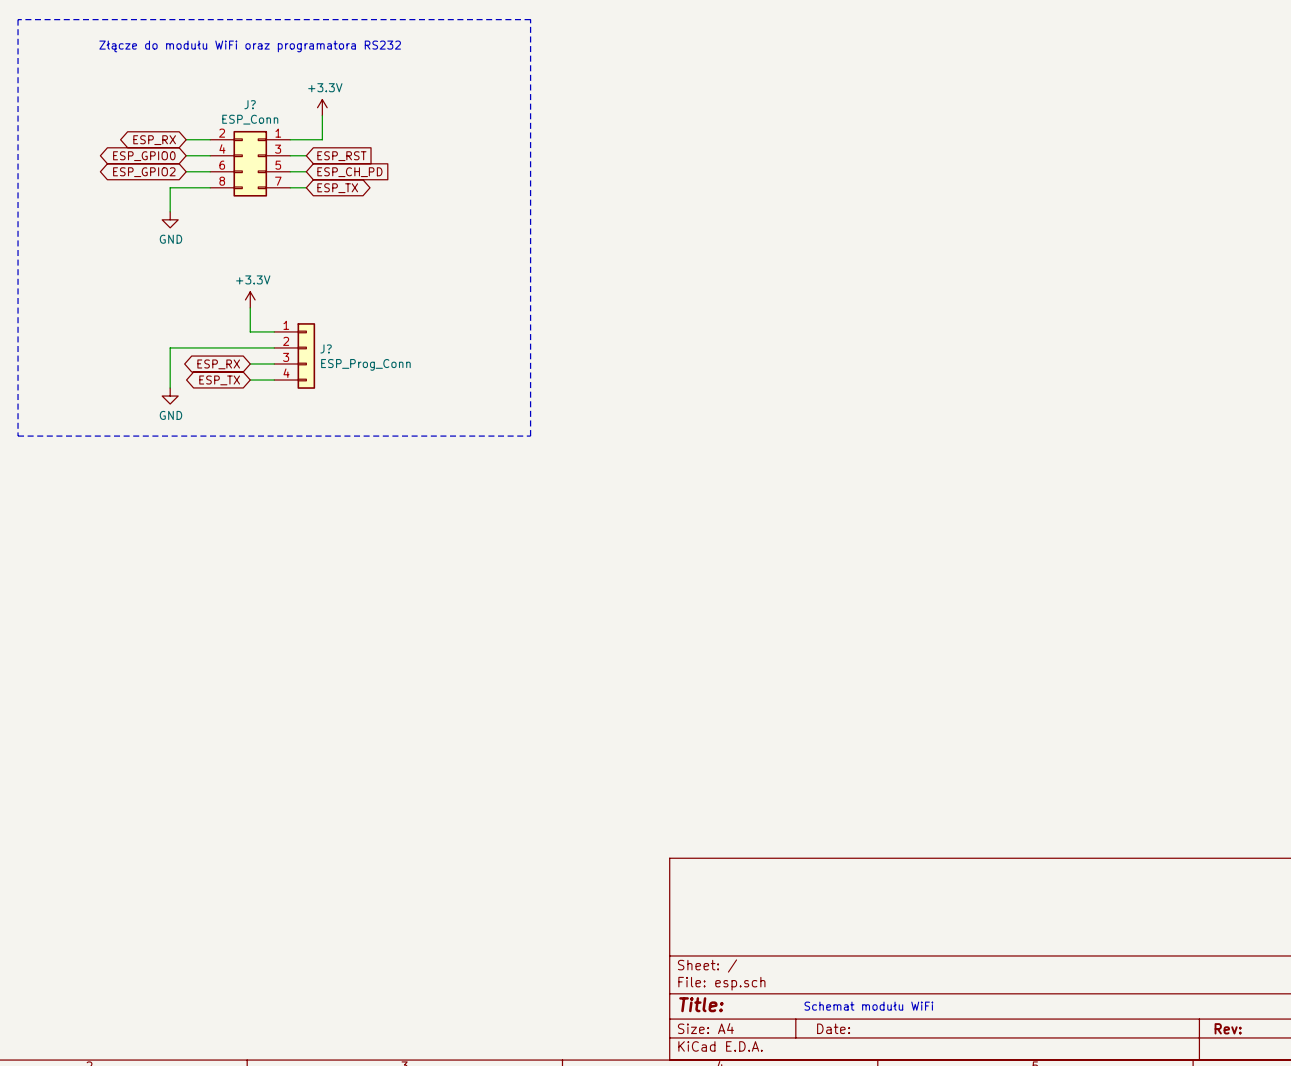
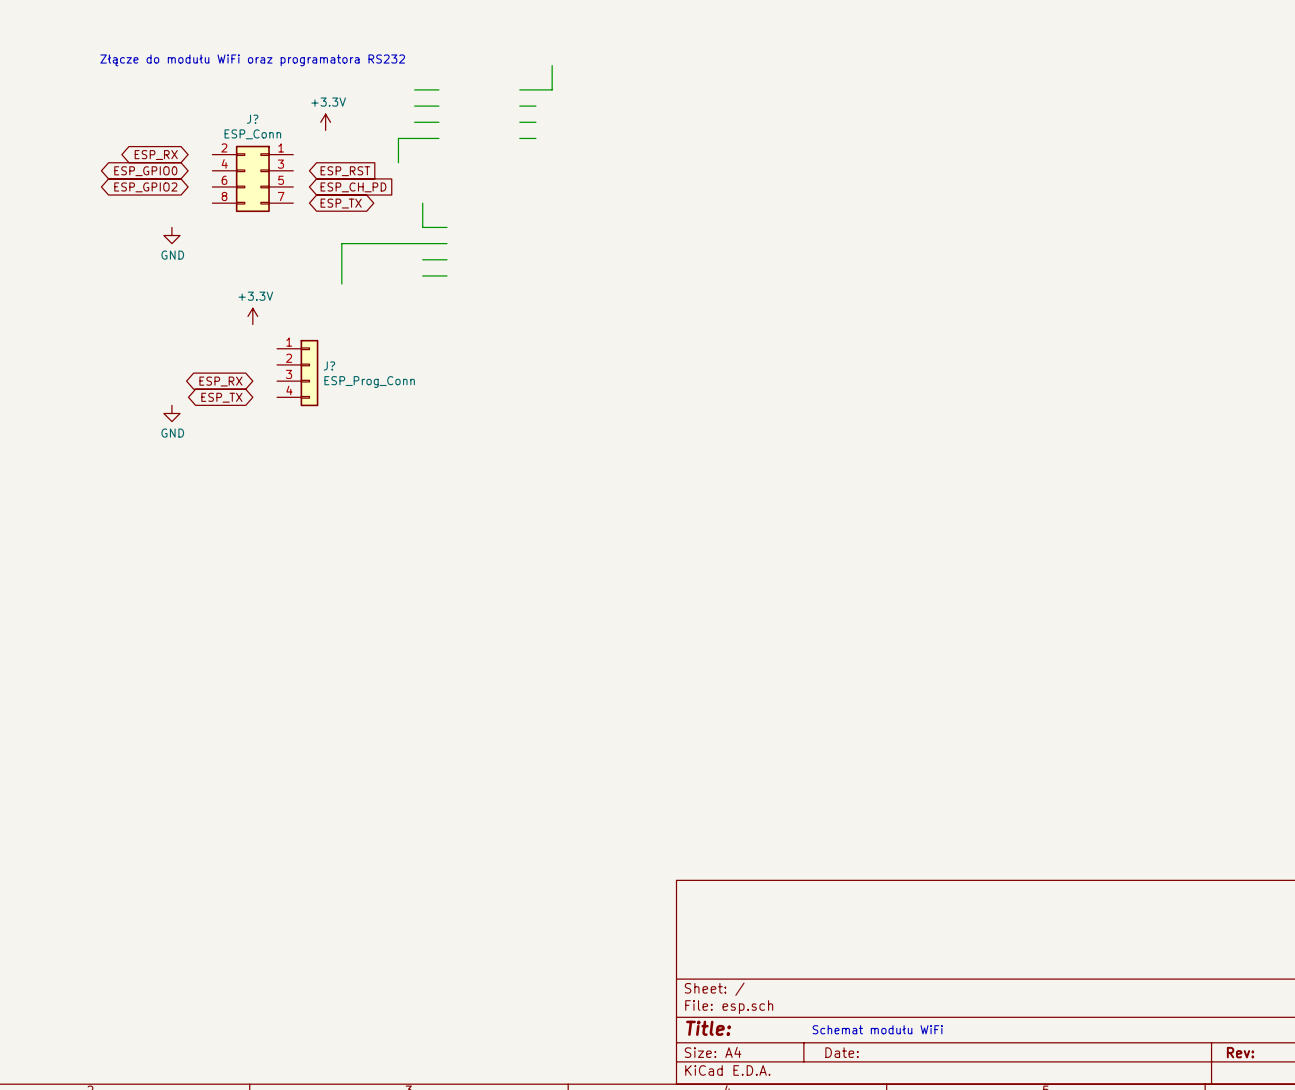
line: (18, 19) (530, 19) (530, 436) (18, 436) (18, 19) -> none
wire: none -> (552, 65) (552, 89) (519, 89)
wire: none -> (414, 89) (438, 89)
wire: none -> (414, 106) (438, 106)
wire: none -> (519, 106) (535, 106)
wire: none -> (414, 122) (438, 122)
wire: none -> (519, 122) (535, 122)
wire: (322, 115) (322, 139) (290, 139) -> none
wire: none -> (438, 138) (398, 138) (398, 162)
wire: none -> (519, 138) (535, 138)
wire: (186, 139) (210, 139) -> none
wire: (186, 155) (210, 155) -> none
wire: (290, 155) (306, 155) -> none
wire: (186, 171) (210, 171) -> none
wire: (290, 171) (306, 171) -> none
wire: (210, 187) (170, 187) (170, 211) -> none
wire: (290, 187) (306, 187) -> none
wire: none -> (422, 203) (422, 227) (446, 227)
wire: none -> (446, 243) (341, 243) (341, 284)
wire: none -> (422, 259) (446, 259)
wire: none -> (422, 275) (446, 275)
wire: (250, 307) (250, 331) (274, 331) -> none
wire: (274, 347) (170, 347) (170, 388) -> none
wire: (250, 363) (274, 363) -> none
wire: (250, 380) (274, 380) -> none

